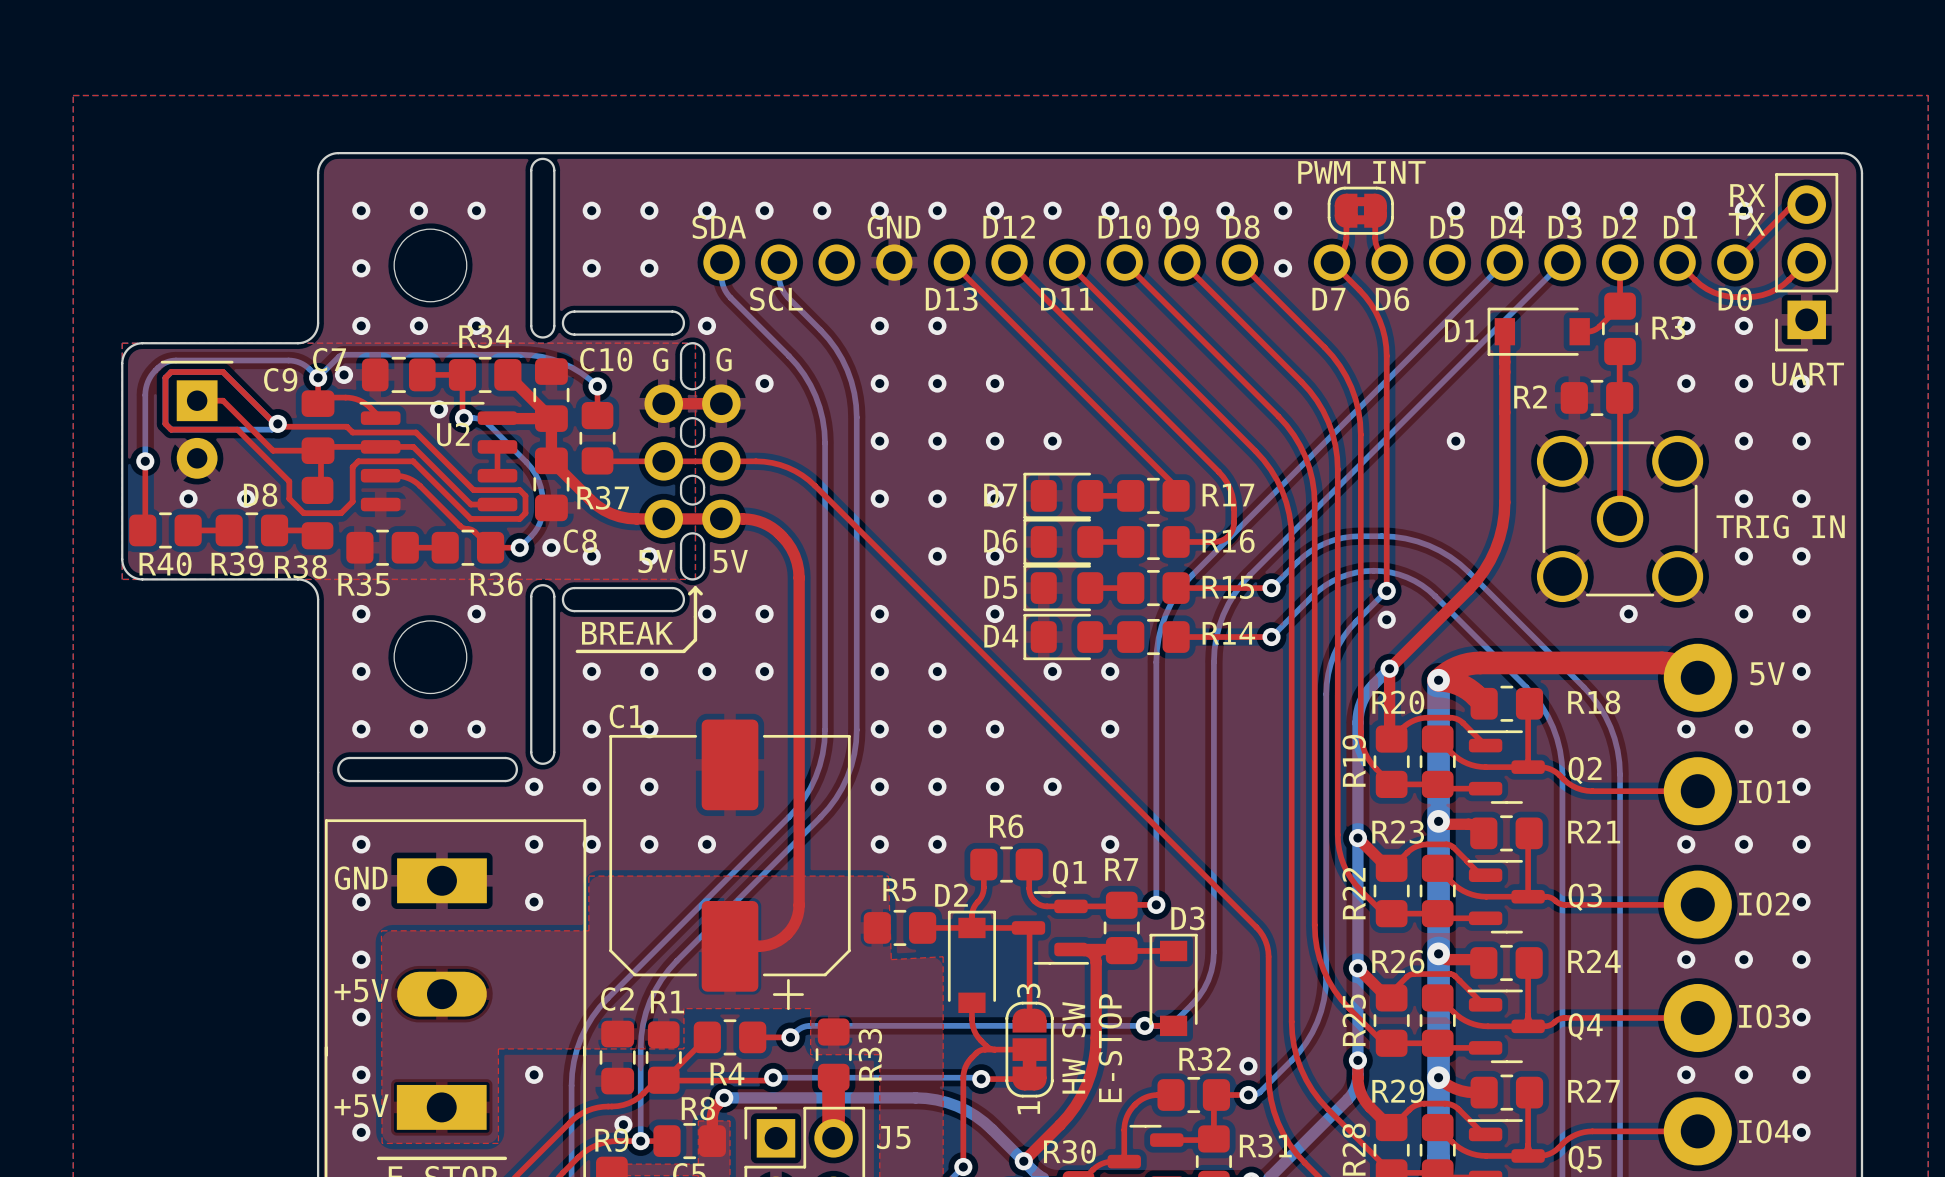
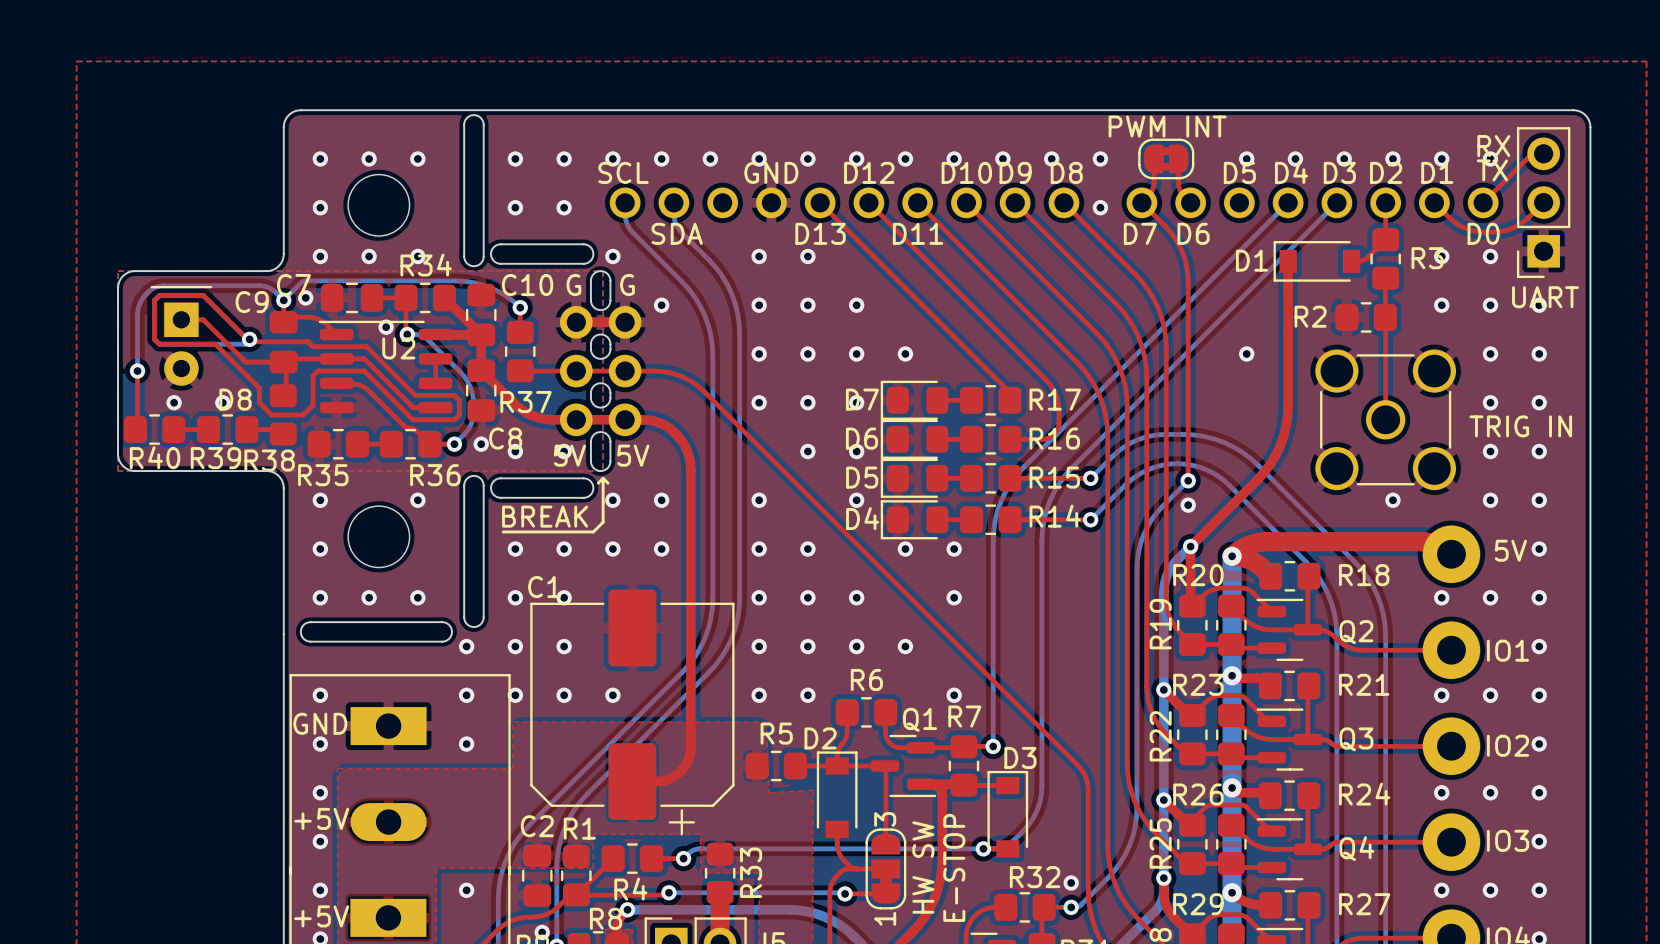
text: SDA (719, 227) -> SCL (623, 172)
text: SCL (776, 299) -> SDA (677, 233)

